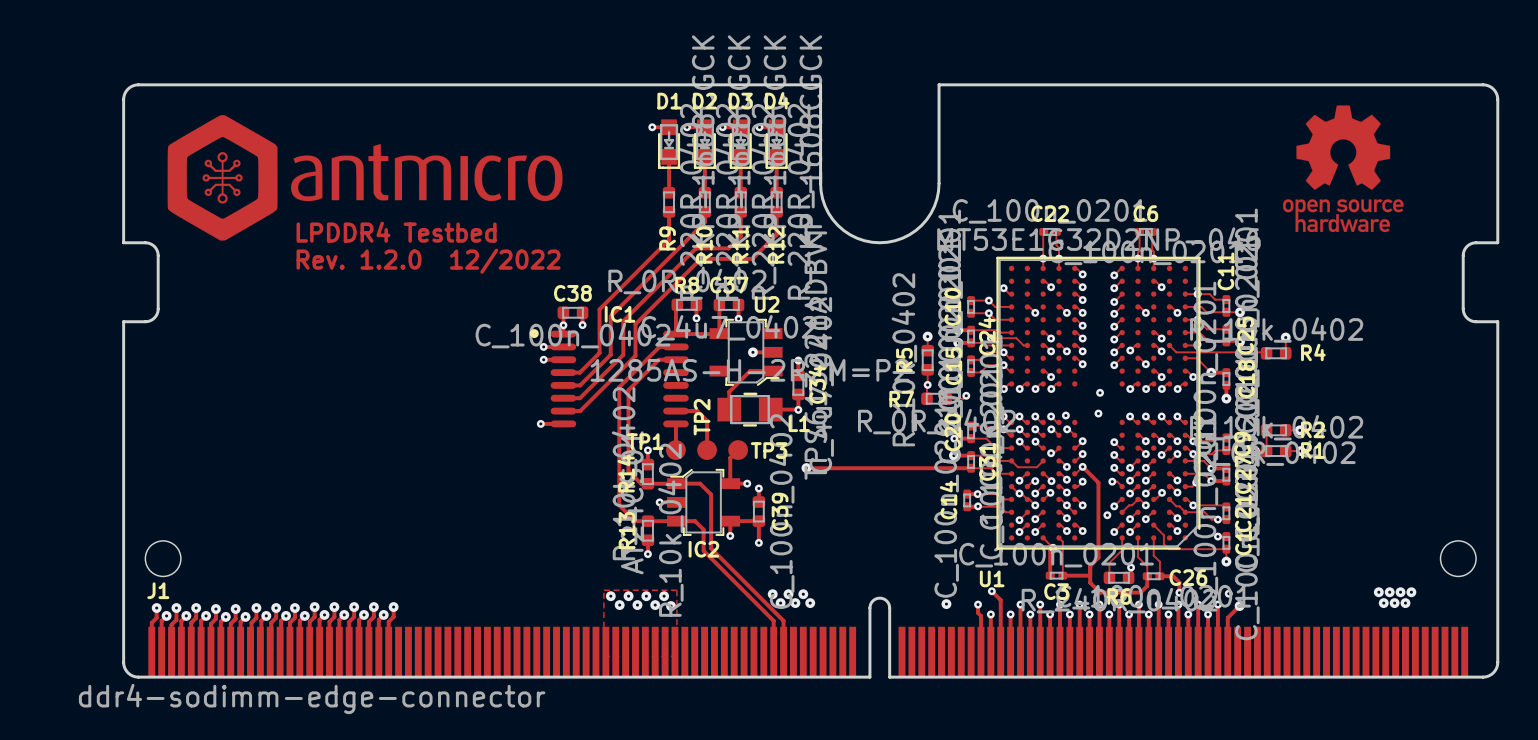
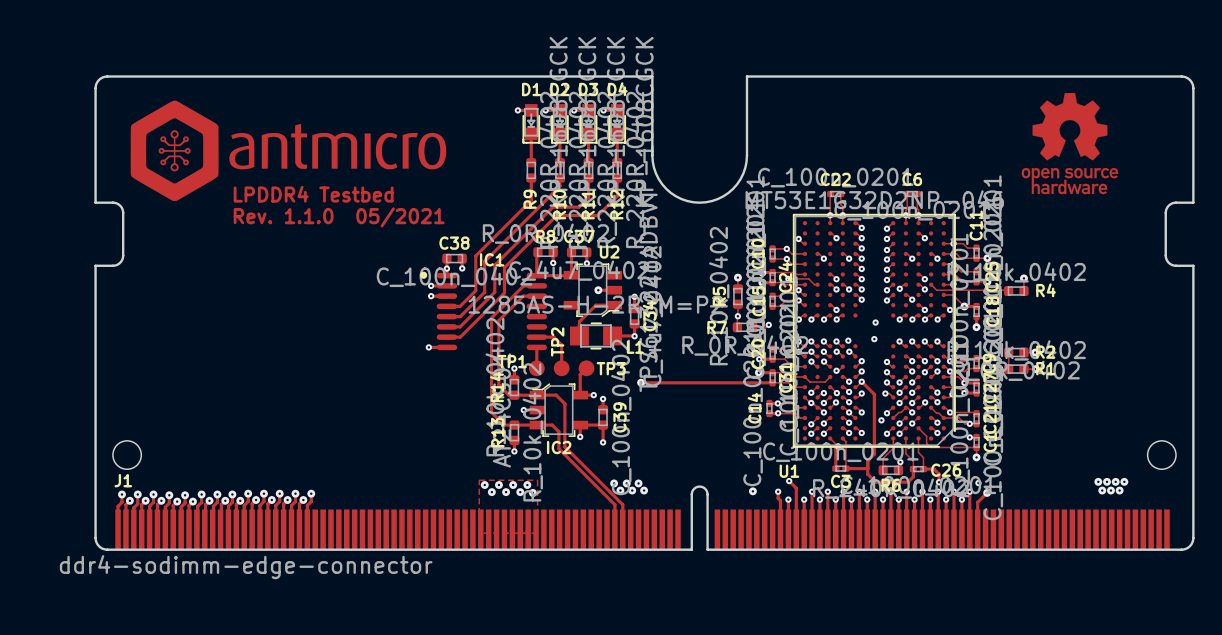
text: Rev. 1.2.0 12/2022 (428, 261) -> Rev. 1.1.0 05/2021 (339, 217)

